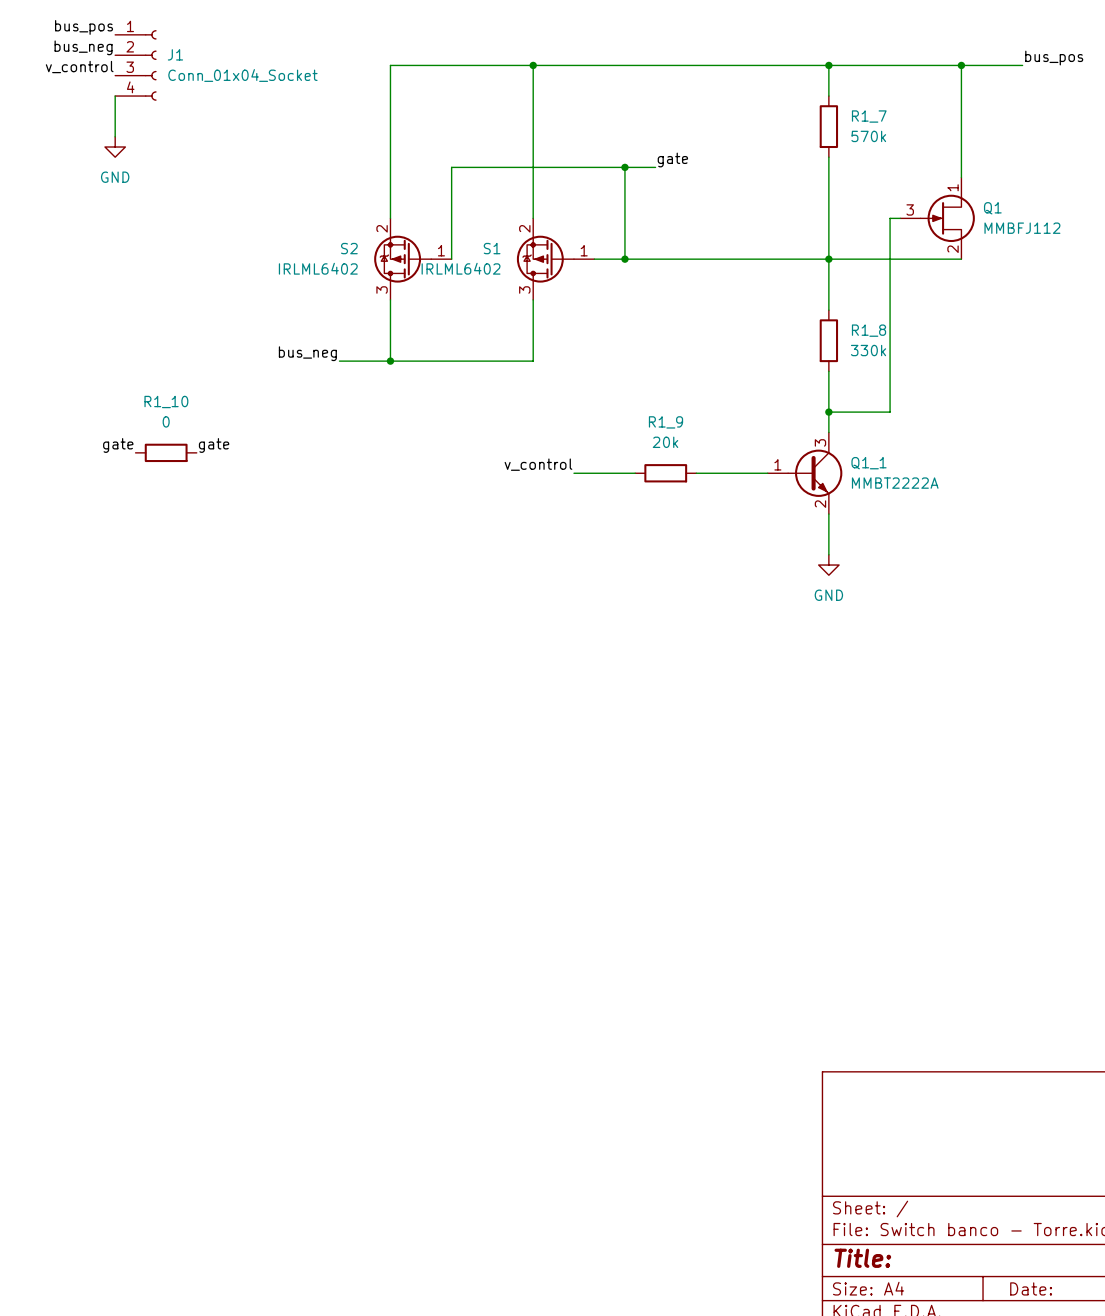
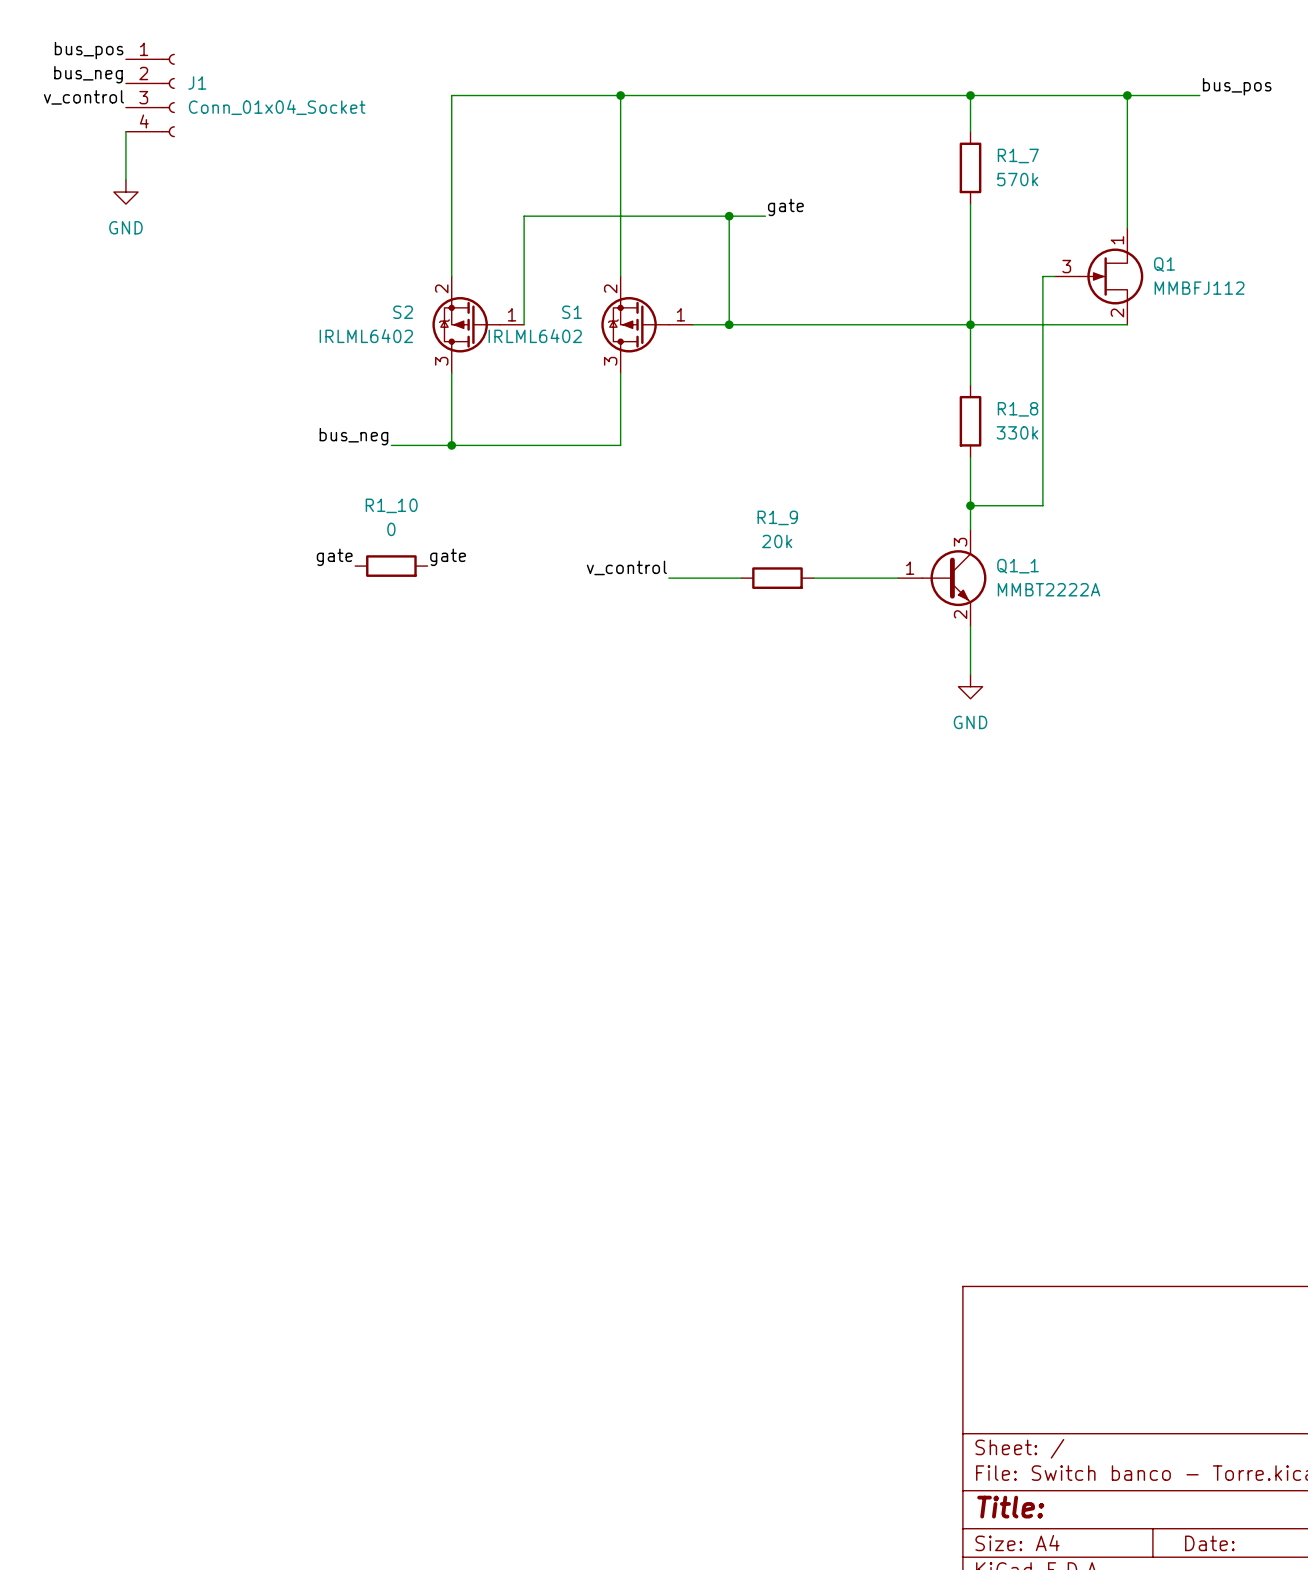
label: gate (118, 445) -> none
label: gate (214, 445) -> none
R1_10 position: (166, 452) -> (391, 566)
label: none -> gate (334, 557)
label: none -> gate (448, 557)

